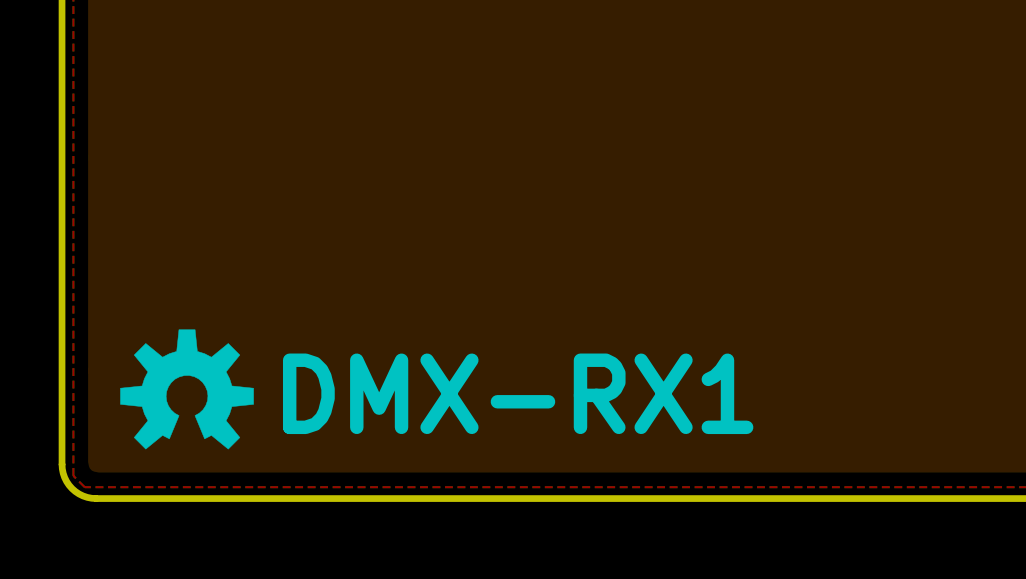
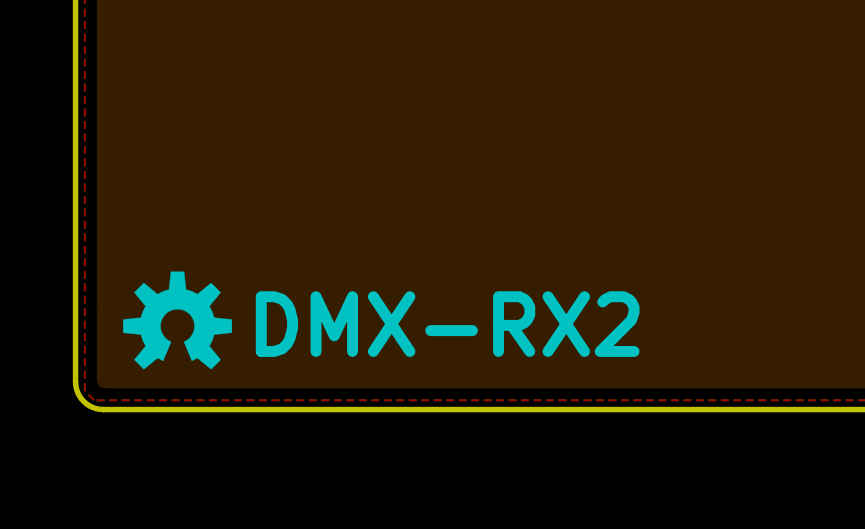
text: DMX-RX1 (518, 393) -> DMX-RX2 (447, 324)

